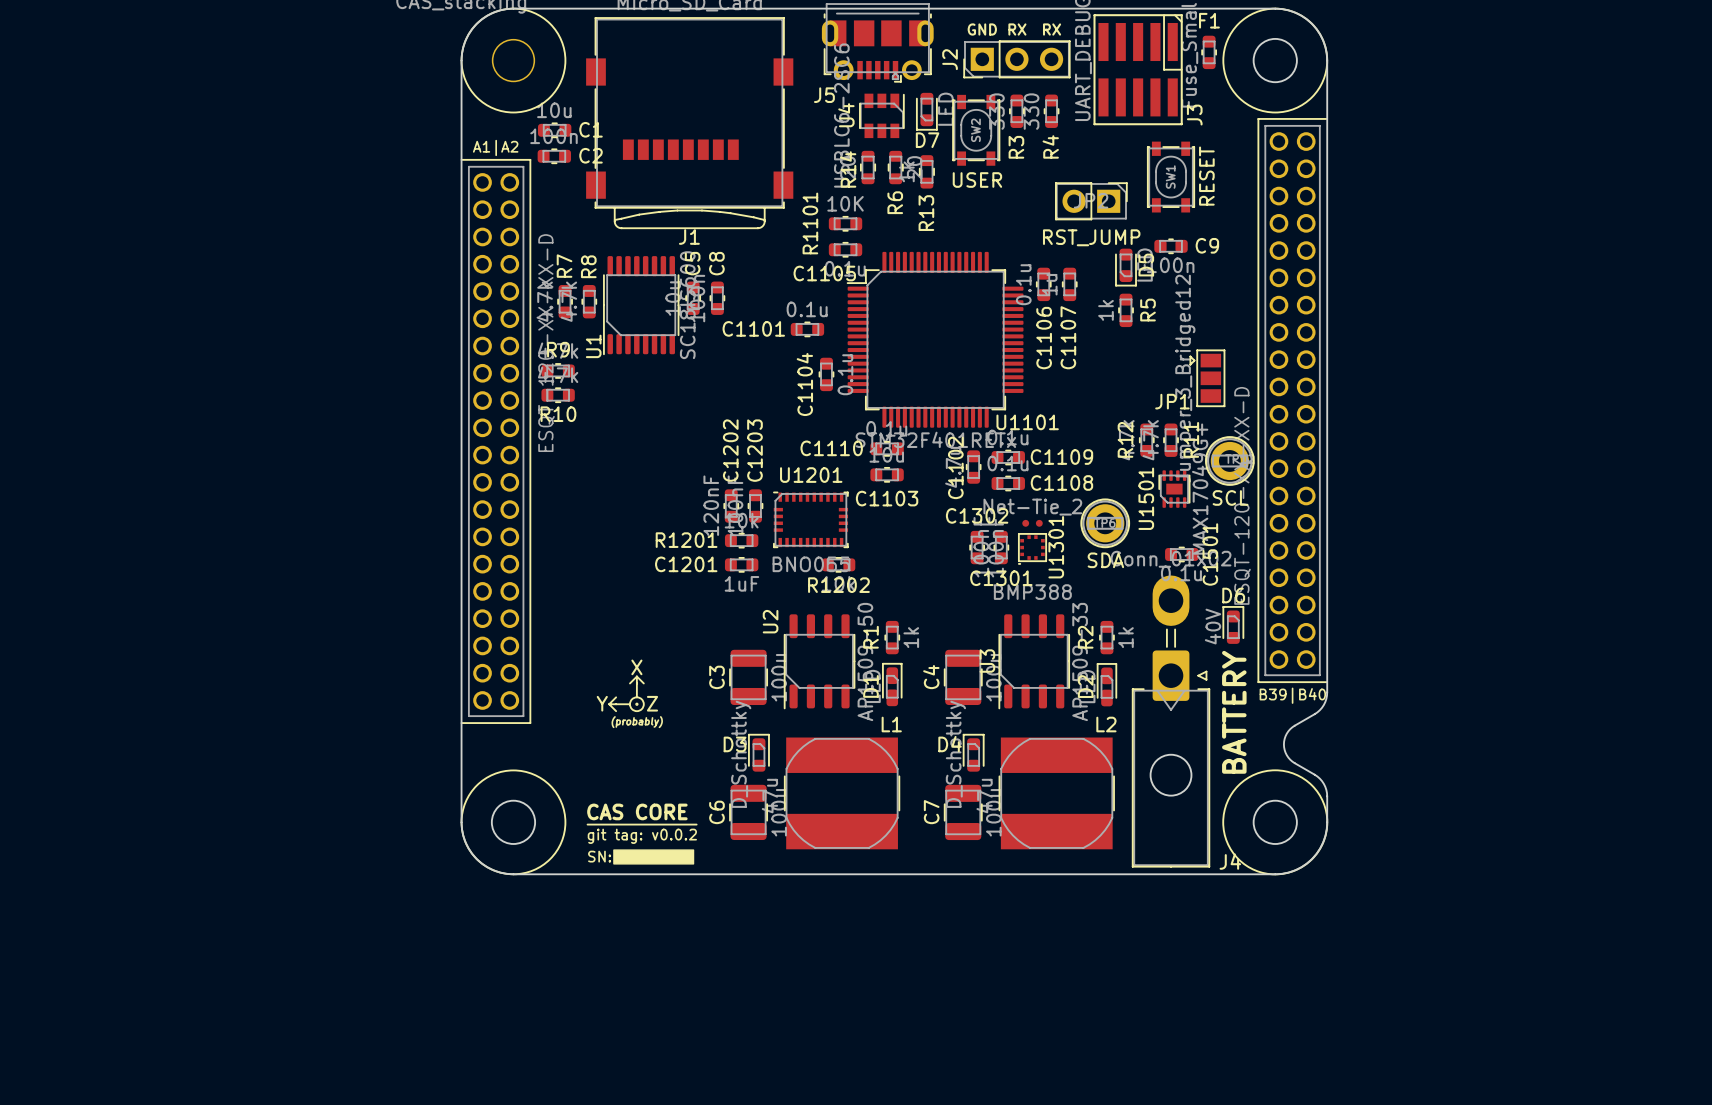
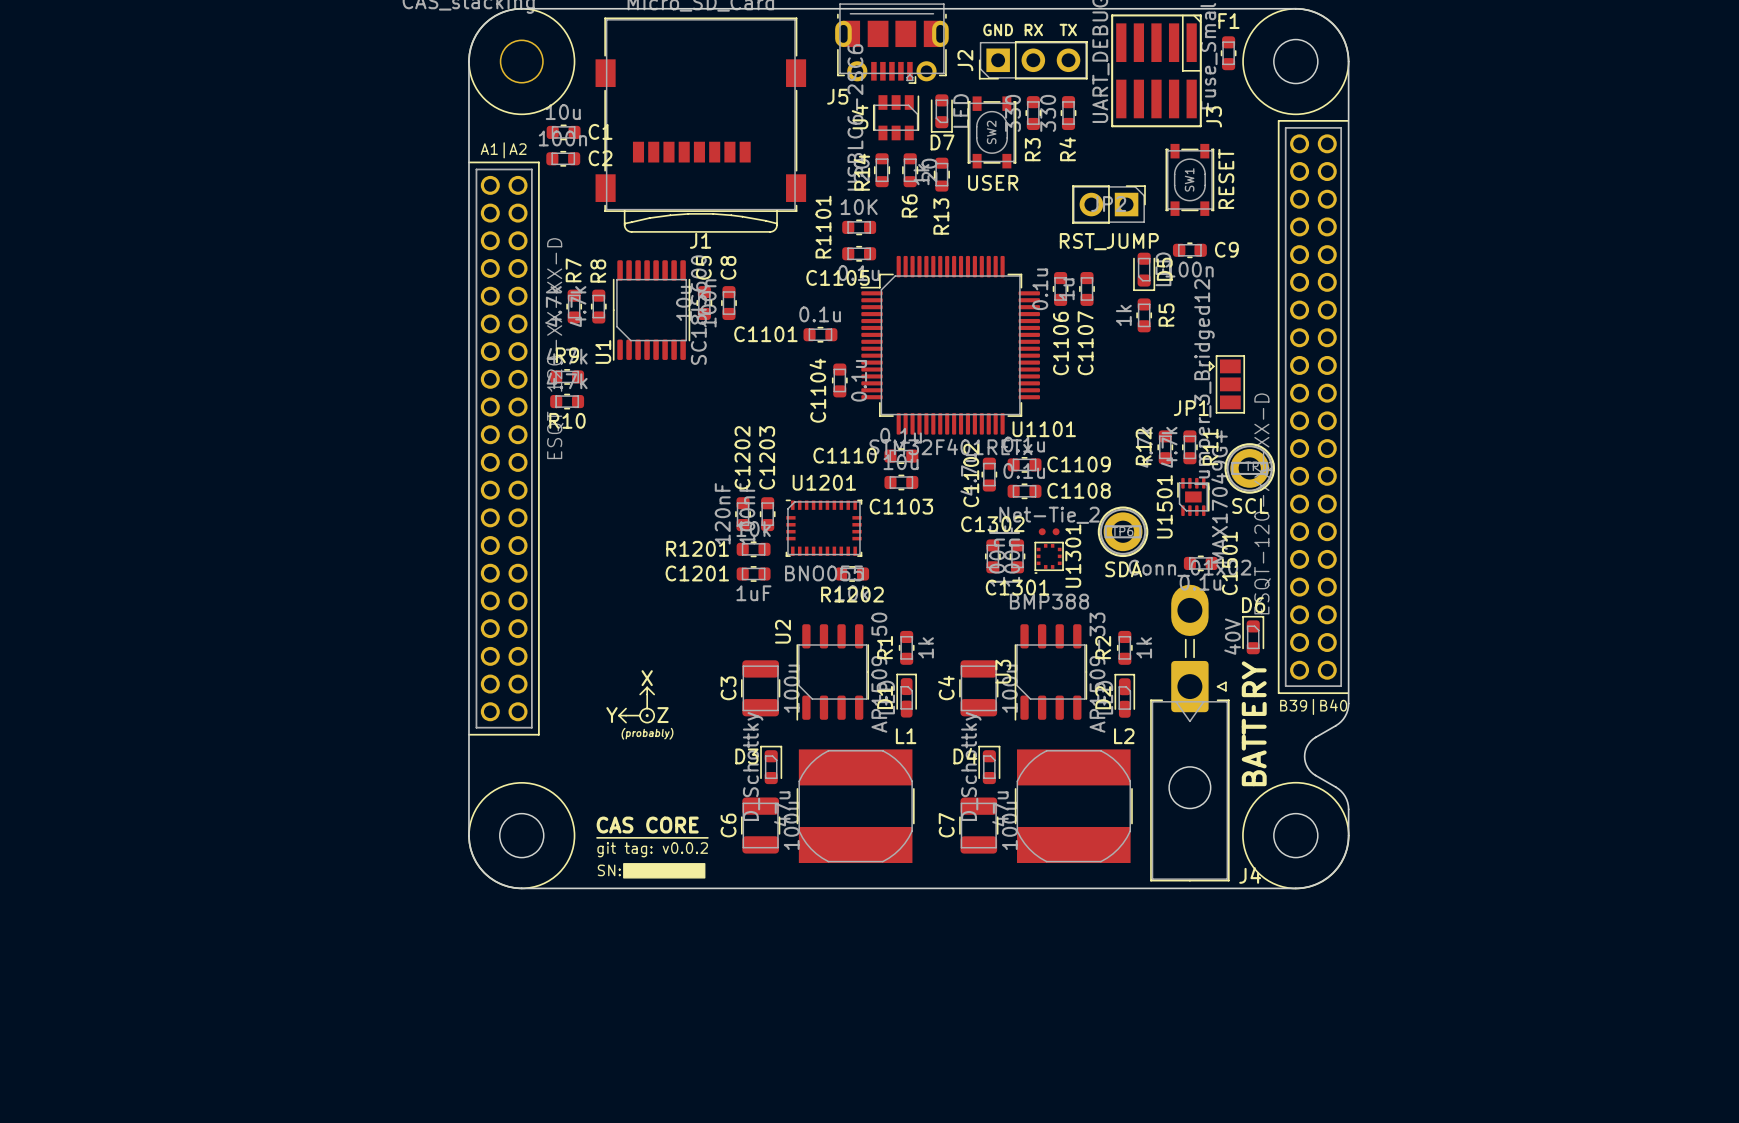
text: RX (1052, 29) -> TX (1068, 29)

